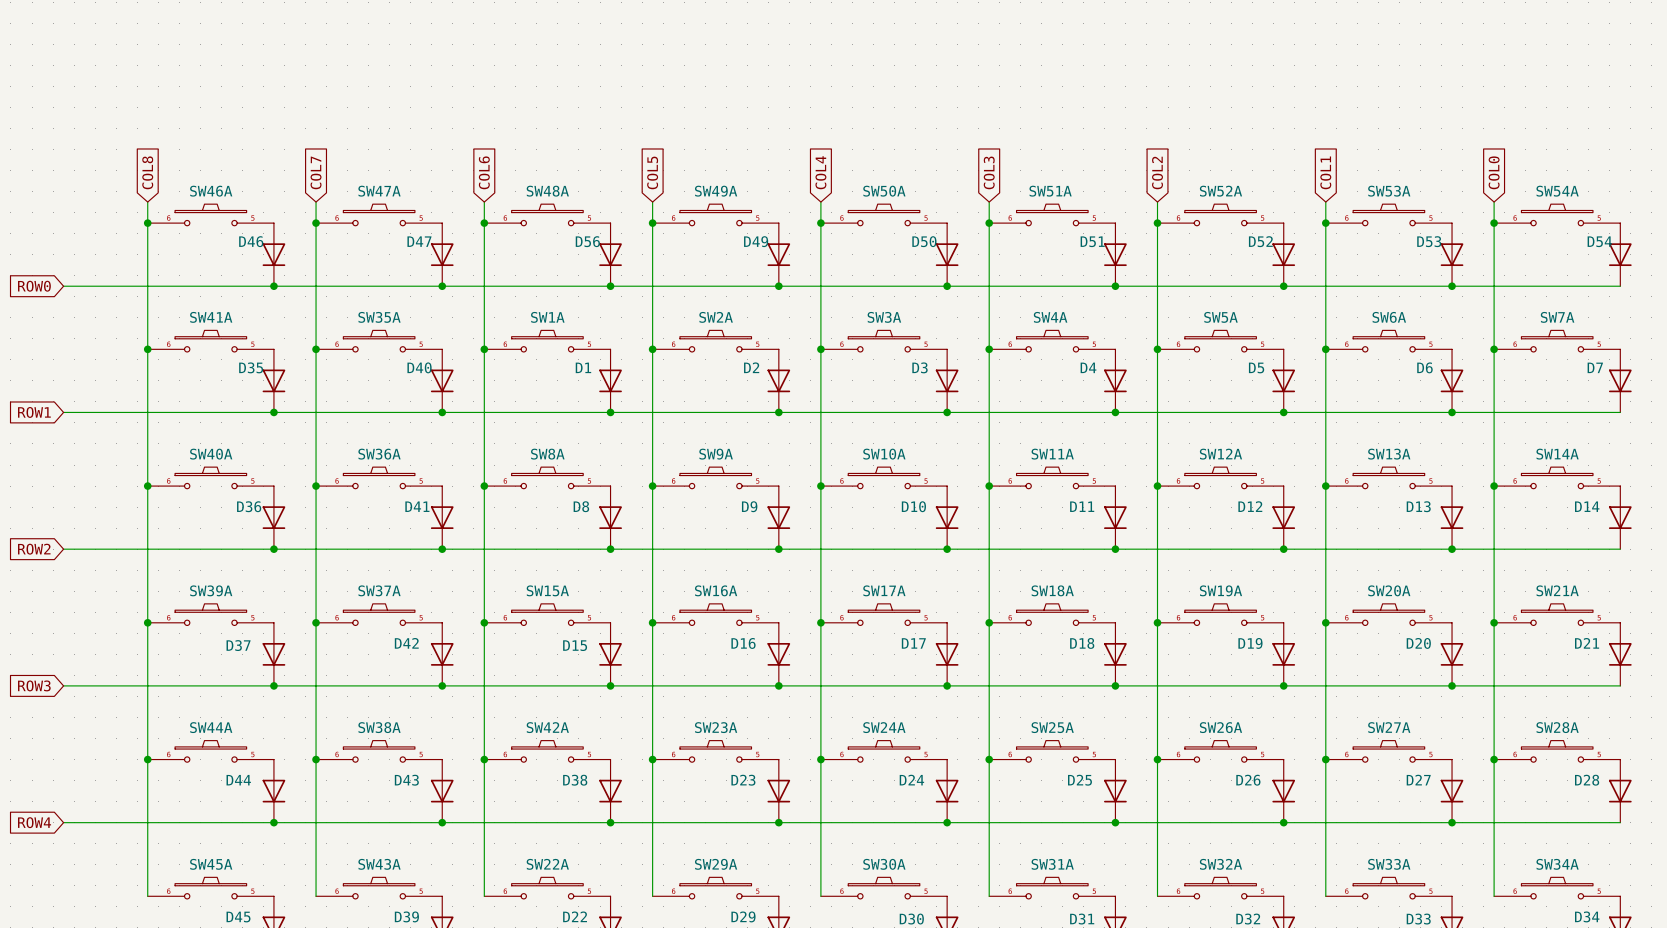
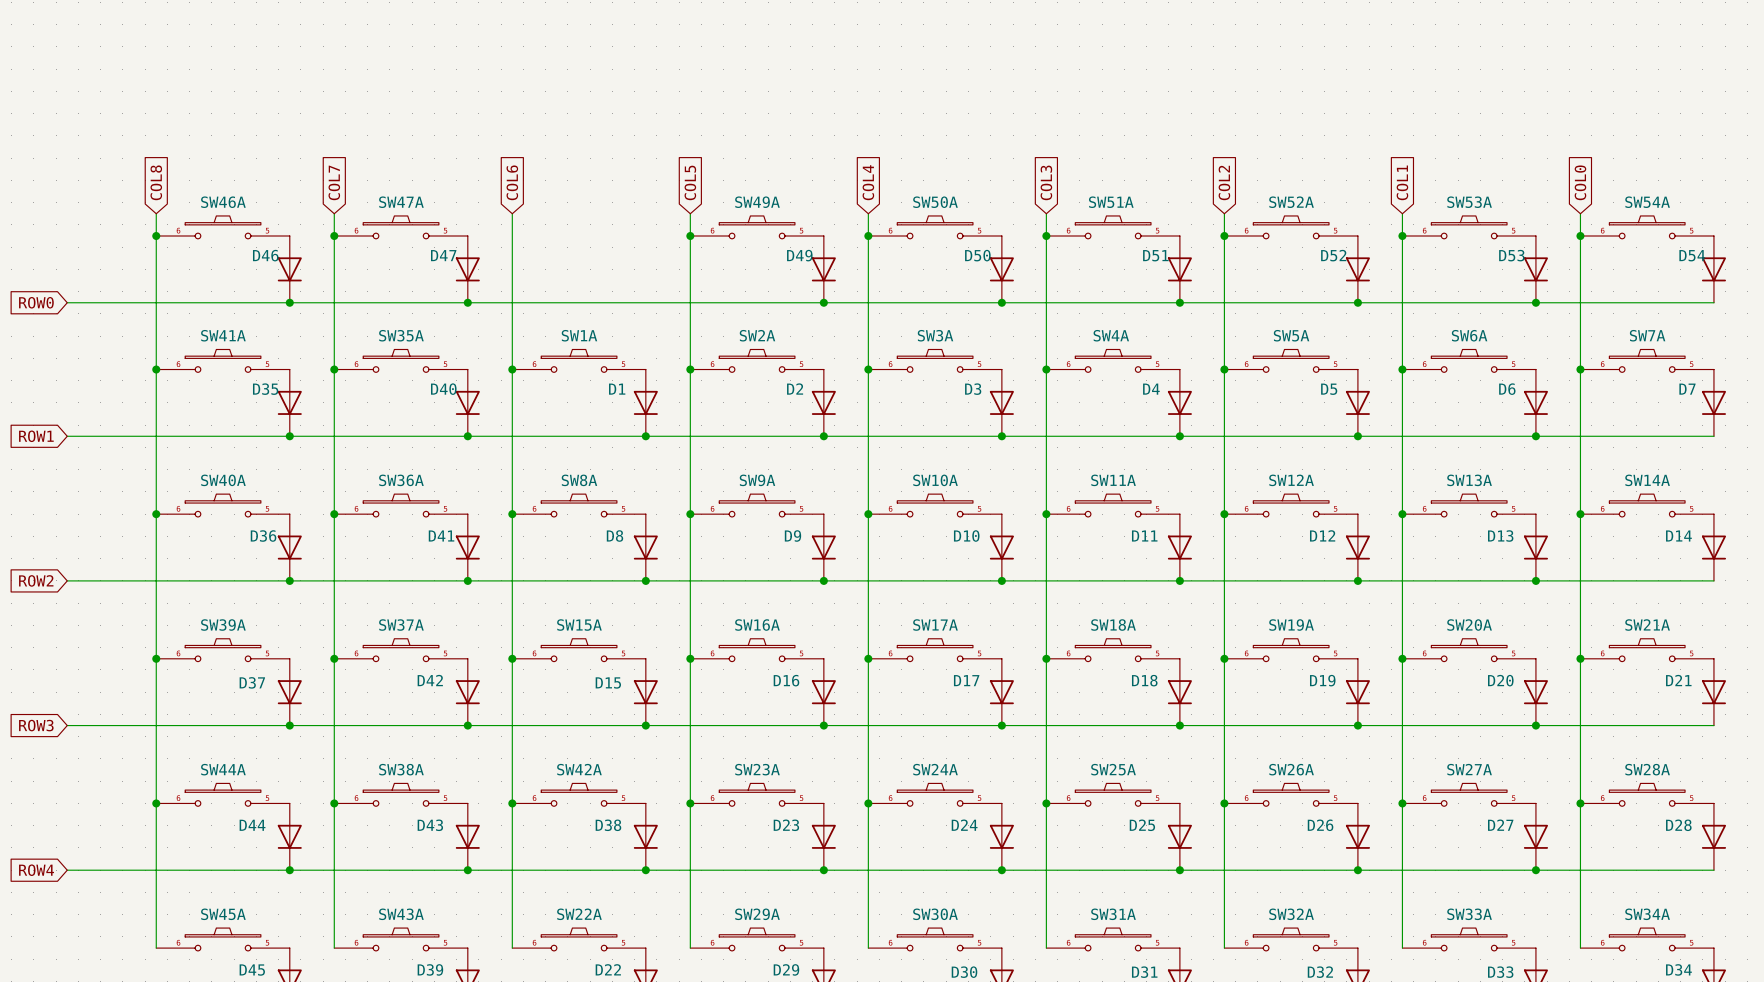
SW48A: (547, 214) -> none
junction: (484, 223) -> none
D56: (610, 254) -> none
junction: (610, 286) -> none

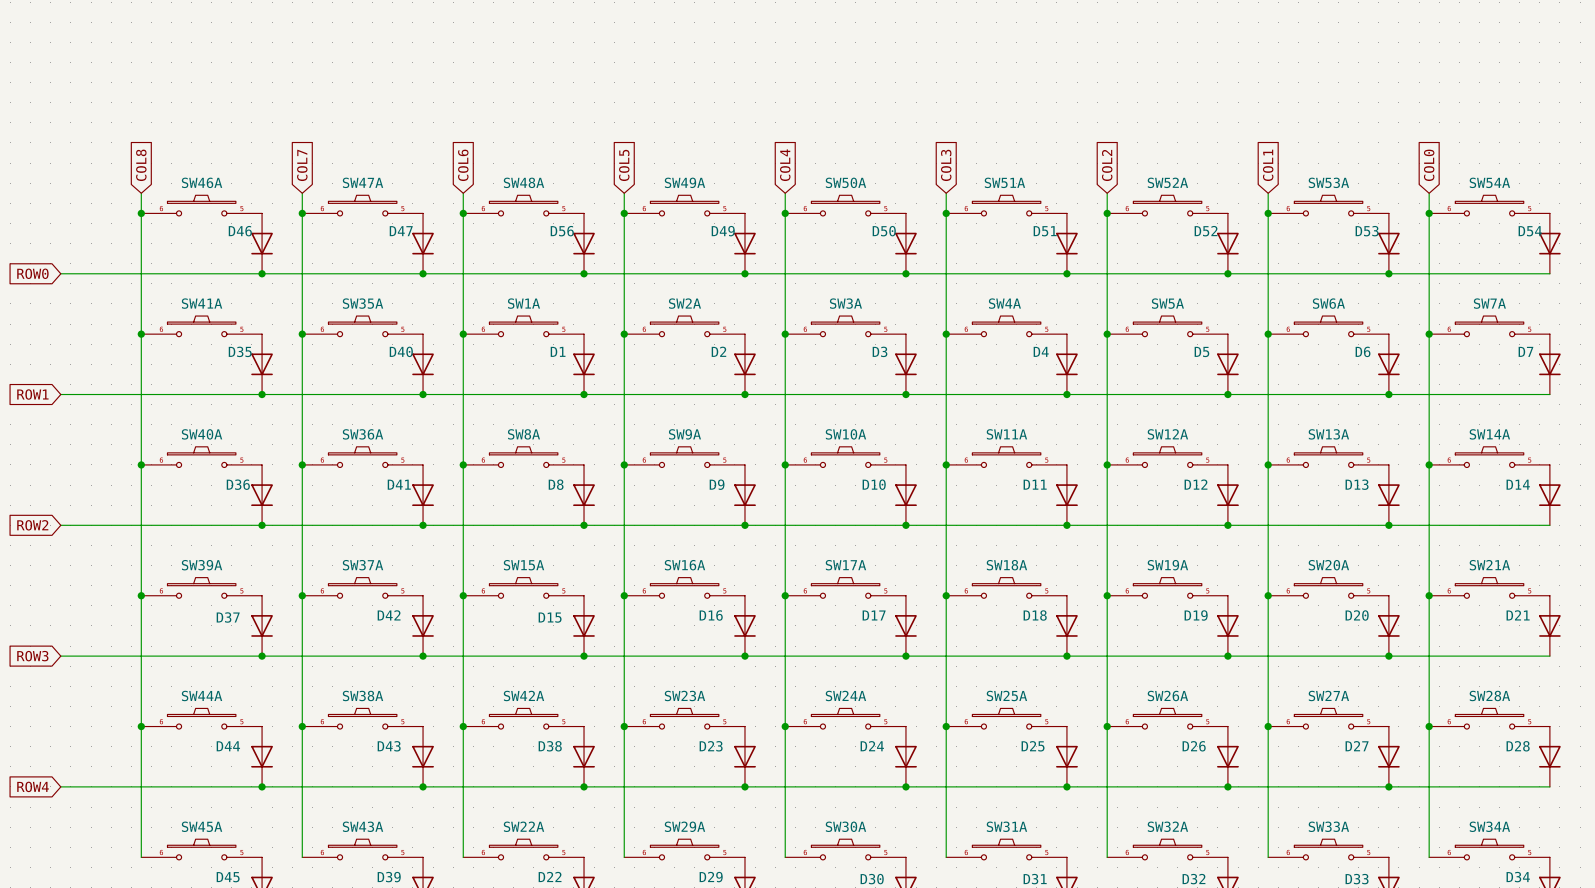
SW48A: none -> (523, 205)
junction: none -> (463, 213)
D56: none -> (584, 243)
junction: none -> (584, 273)

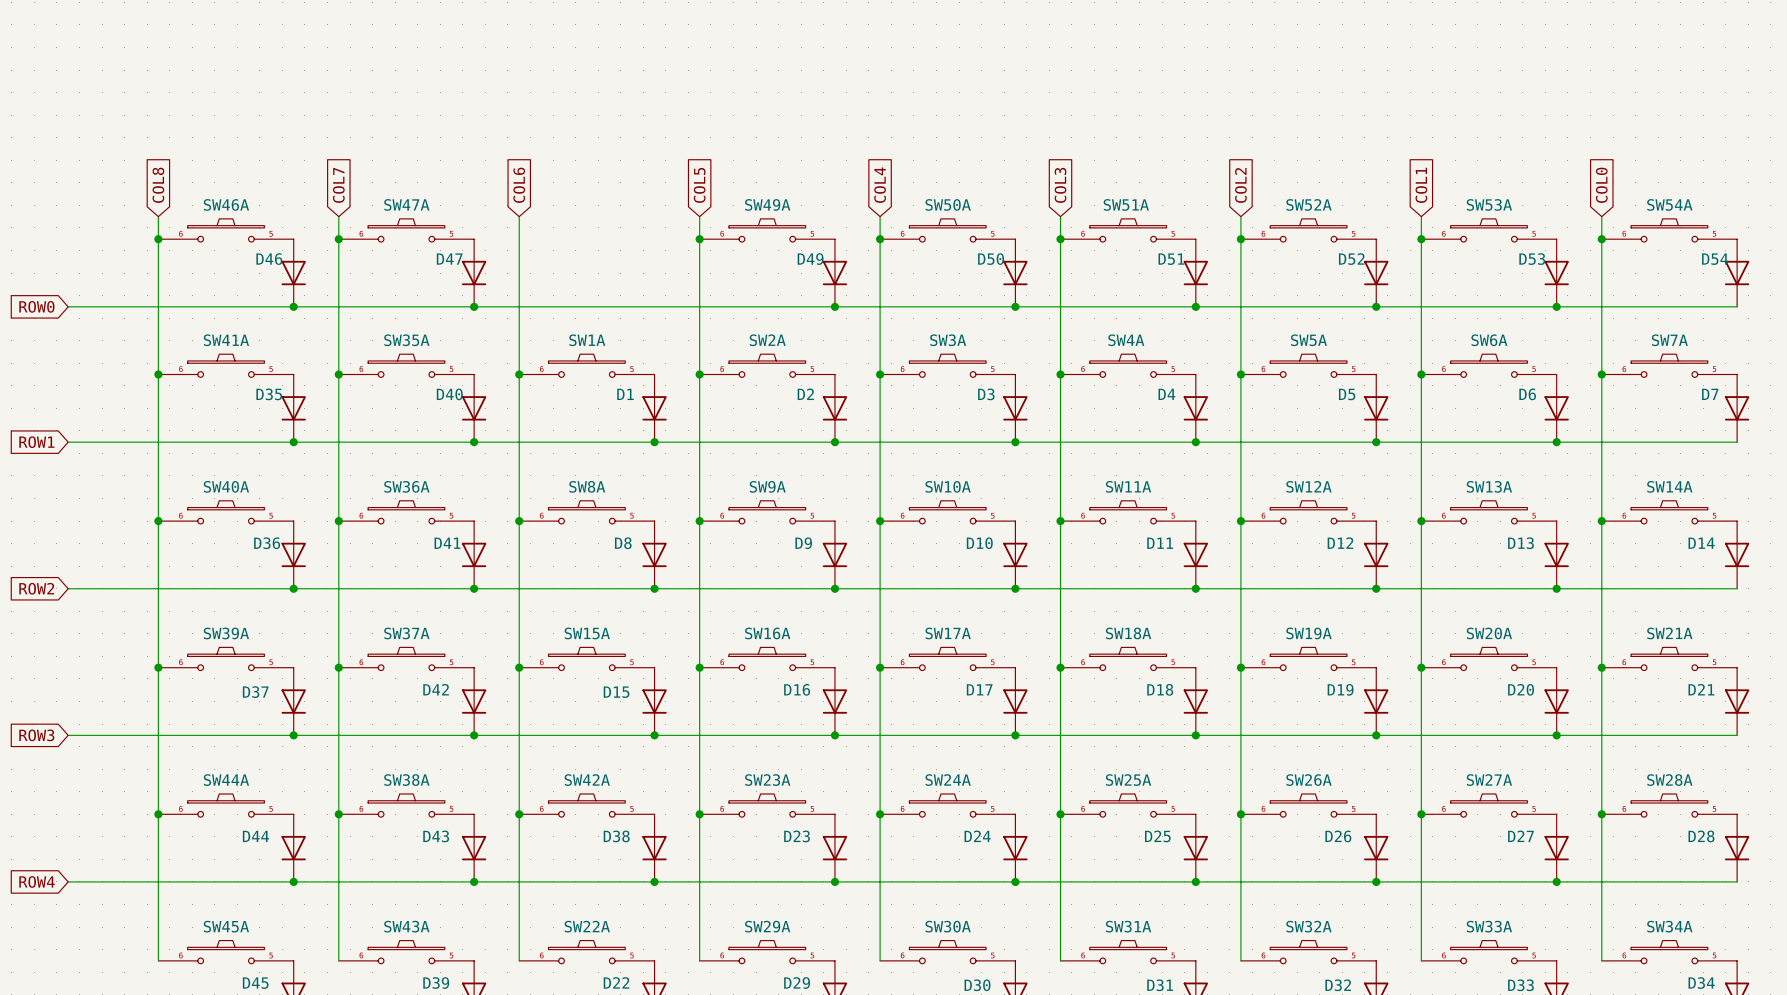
SW48A: (523, 205) -> none
junction: (463, 213) -> none
D56: (584, 243) -> none
junction: (584, 273) -> none

